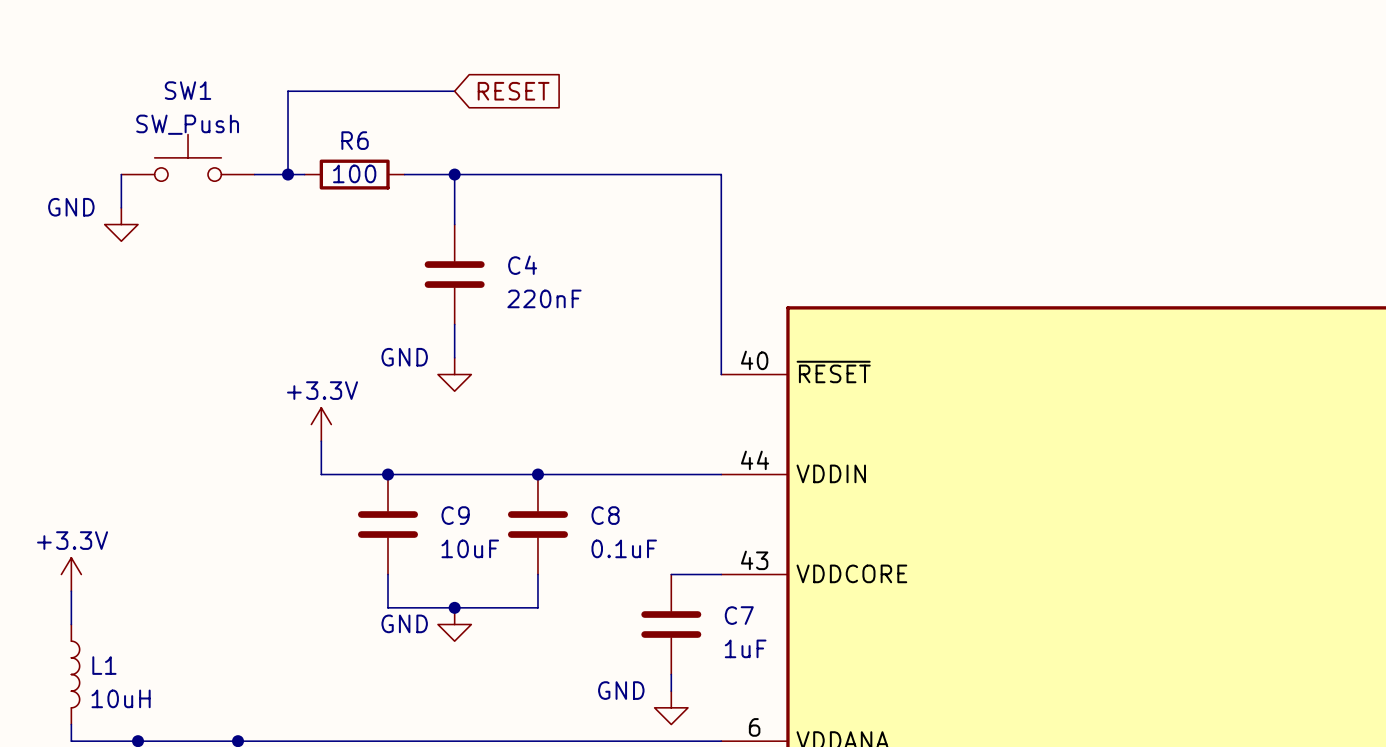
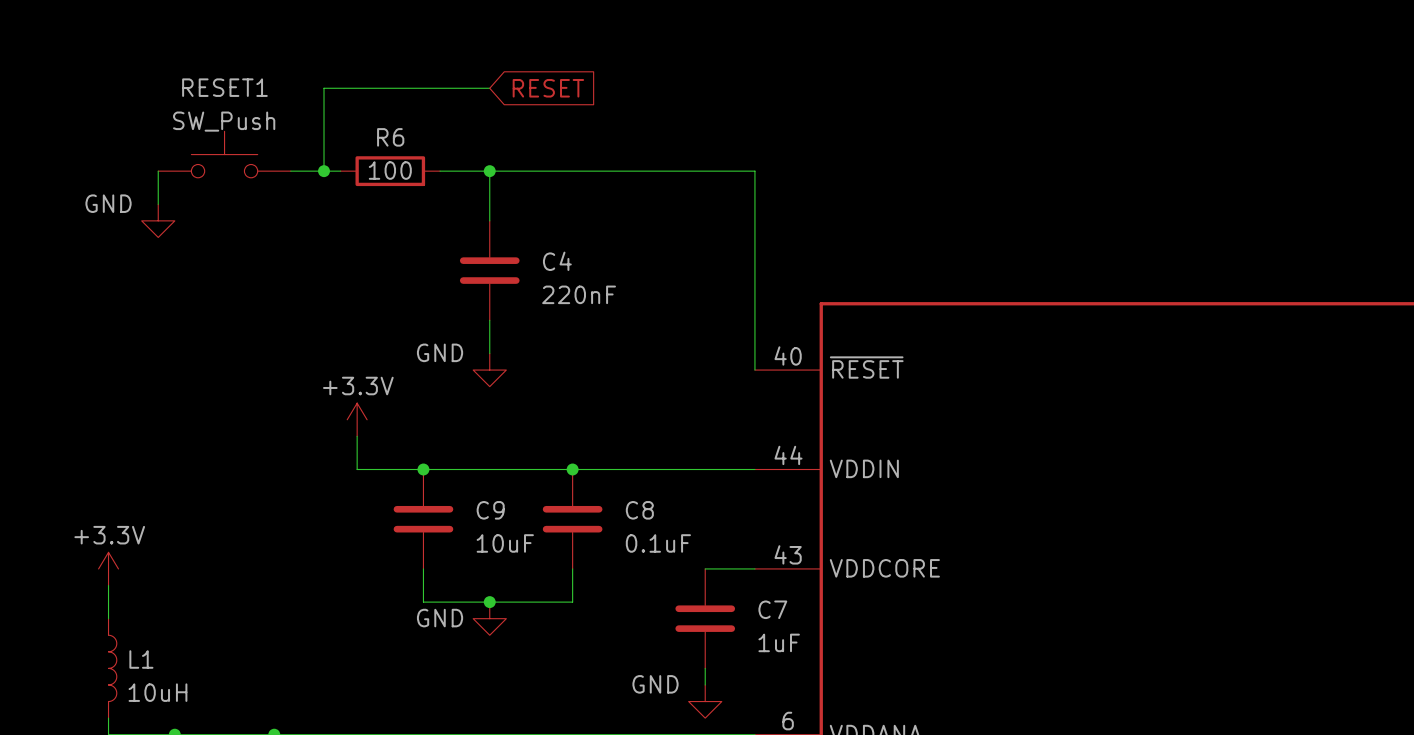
SW1 name: SW1 (188, 90) -> RESET1 (224, 87)

